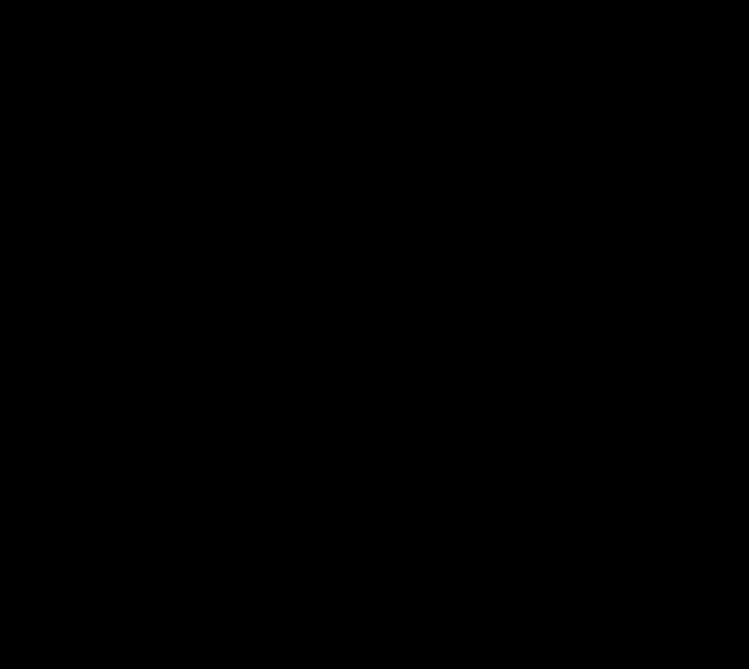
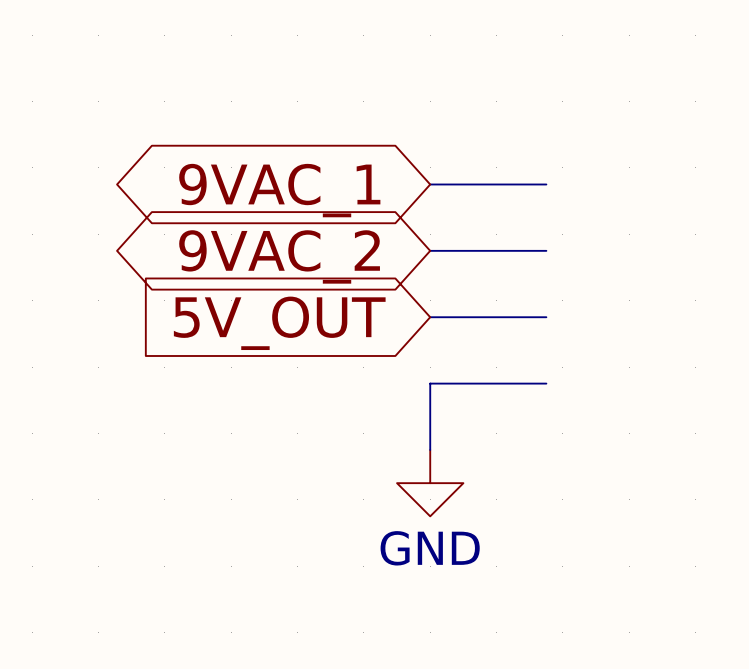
wire: none -> (430, 184) (546, 184)
global label: none -> 9VAC_1 (279, 190)
wire: none -> (430, 250) (546, 250)
global label: none -> 9VAC_2 (279, 256)
wire: none -> (430, 317) (546, 317)
global label: none -> 5V_OUT (279, 323)
wire: none -> (546, 383) (430, 383) (430, 449)
power symbol: none -> GND (430, 483)

